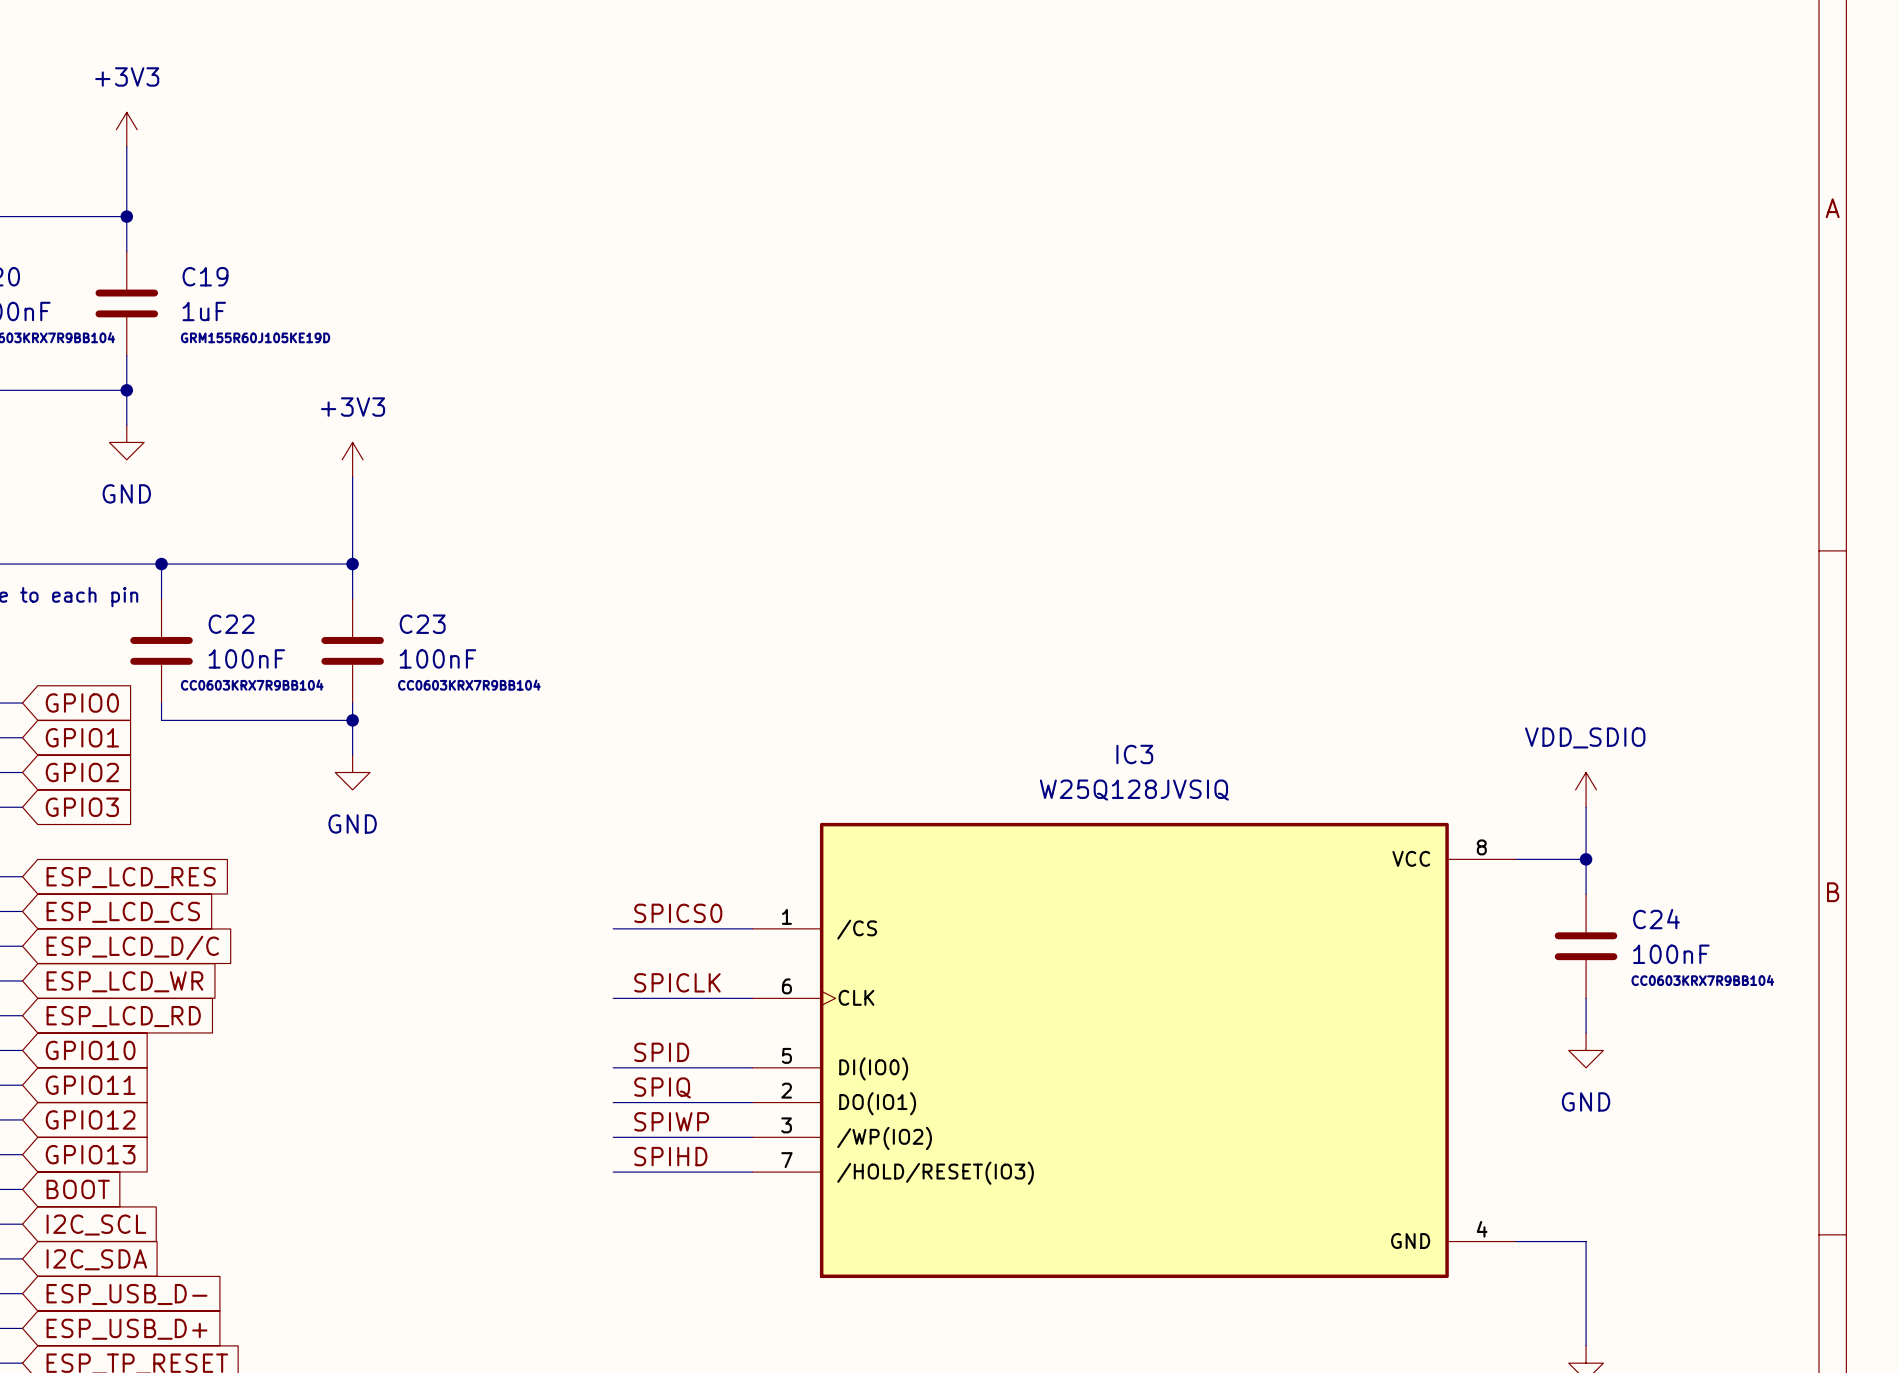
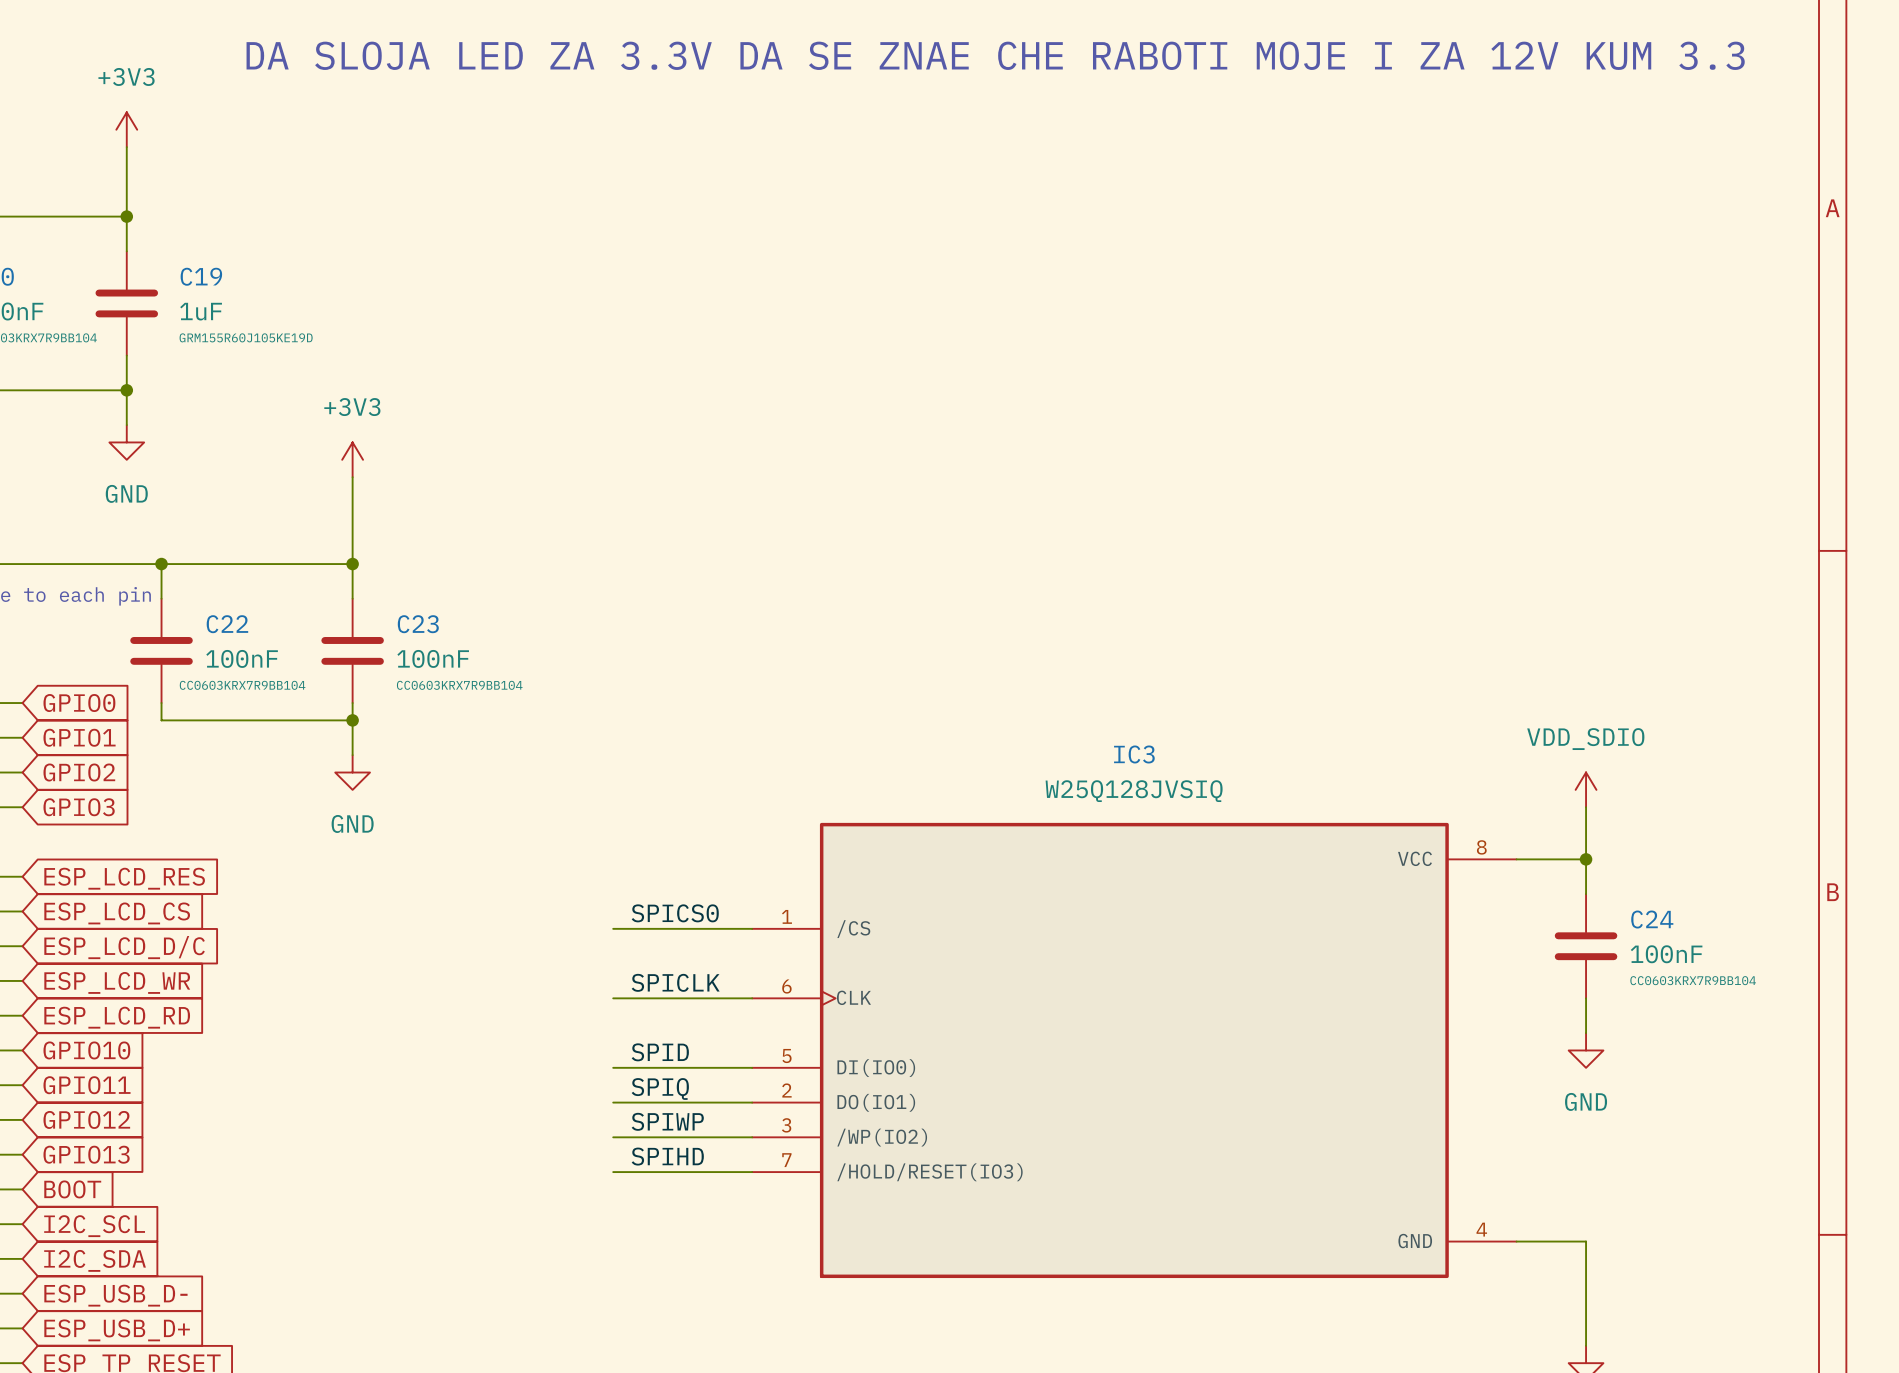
text: none -> DA SLOJA LED ZA 3.3V DA SE ZNAE CHE RABOTI MOJE I ZA 12V KUM 3.3 (995, 55)

